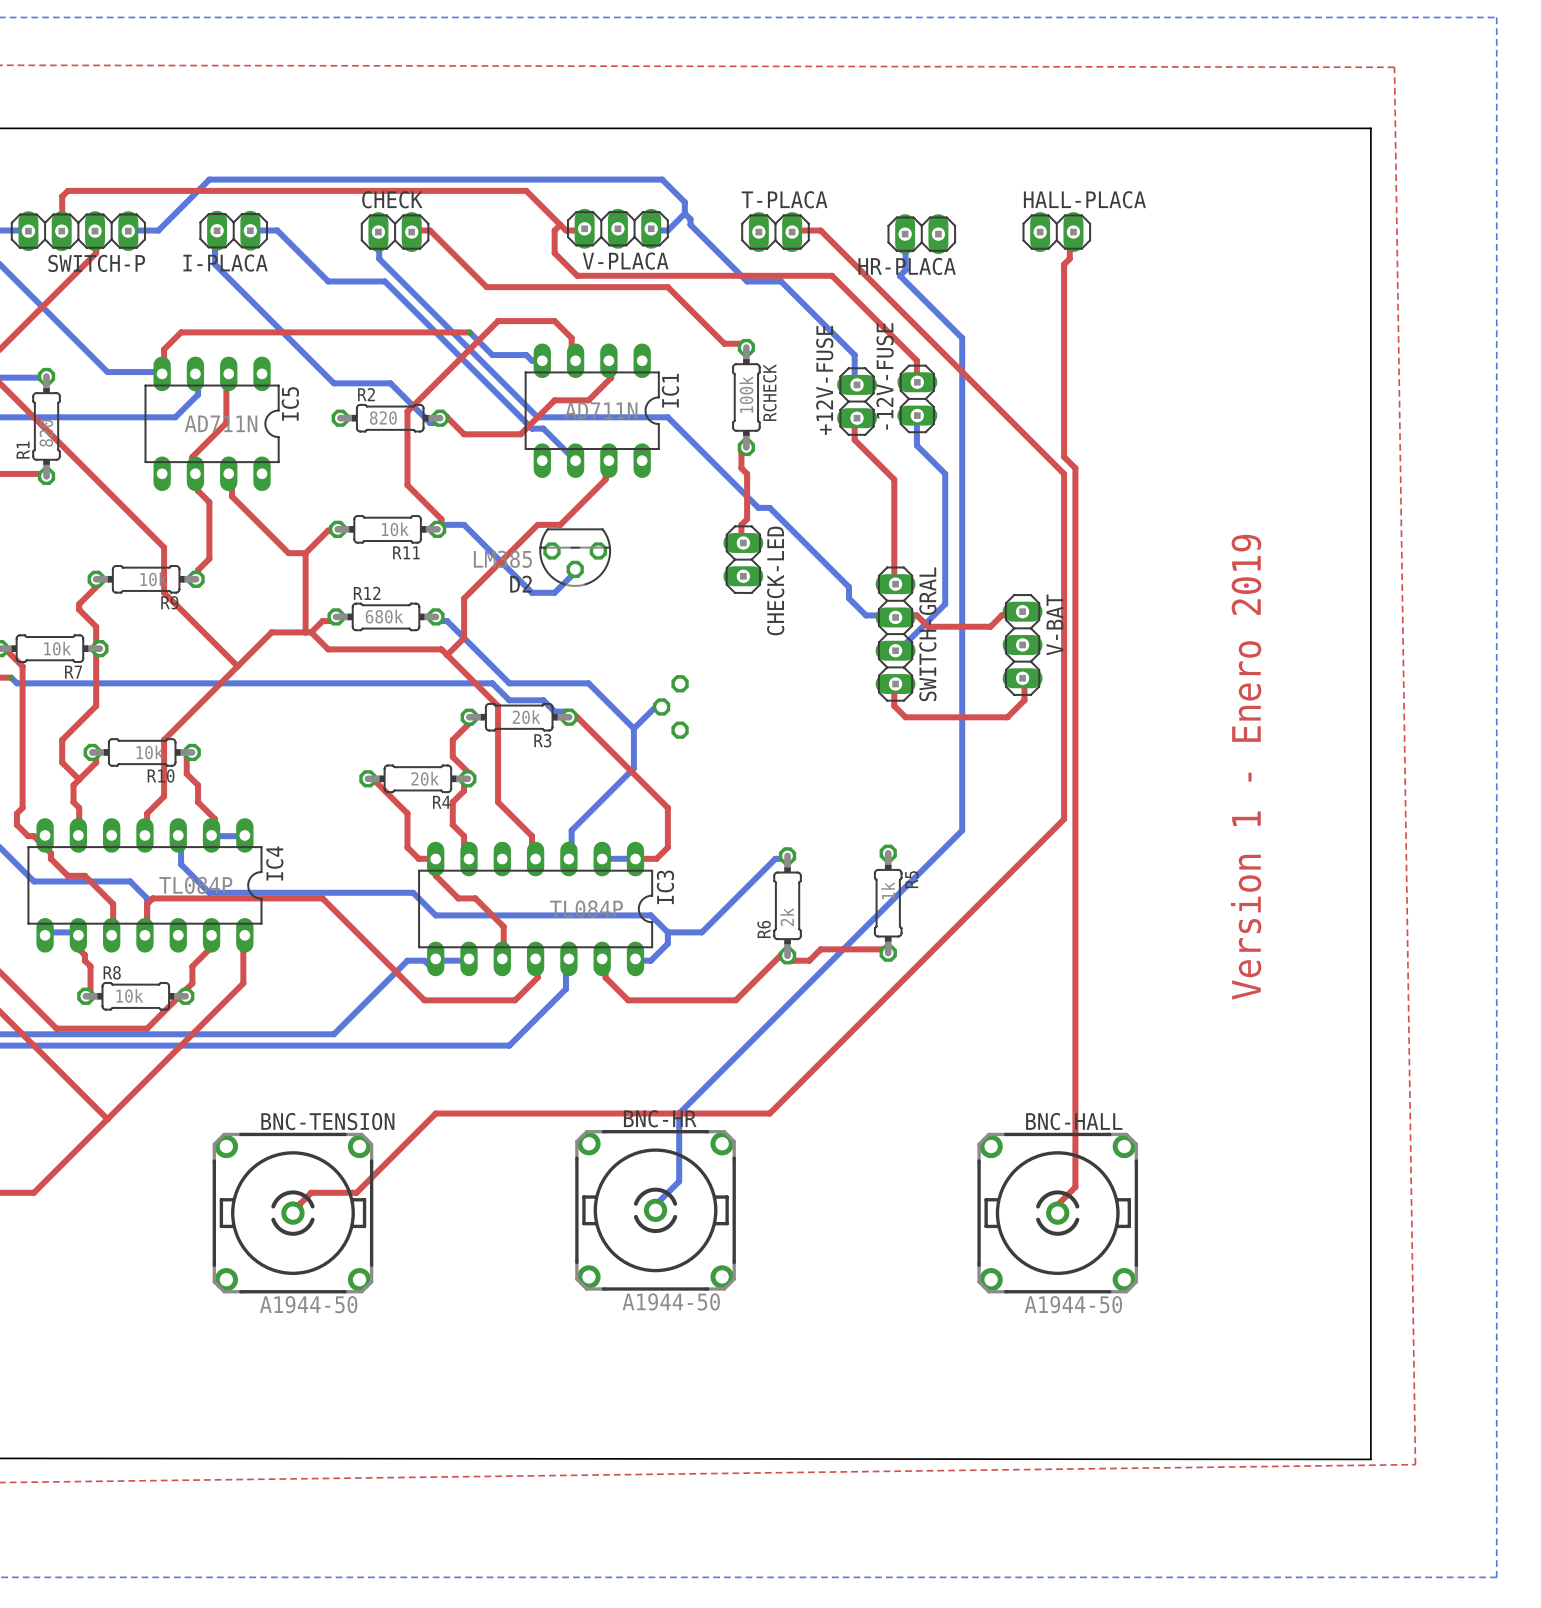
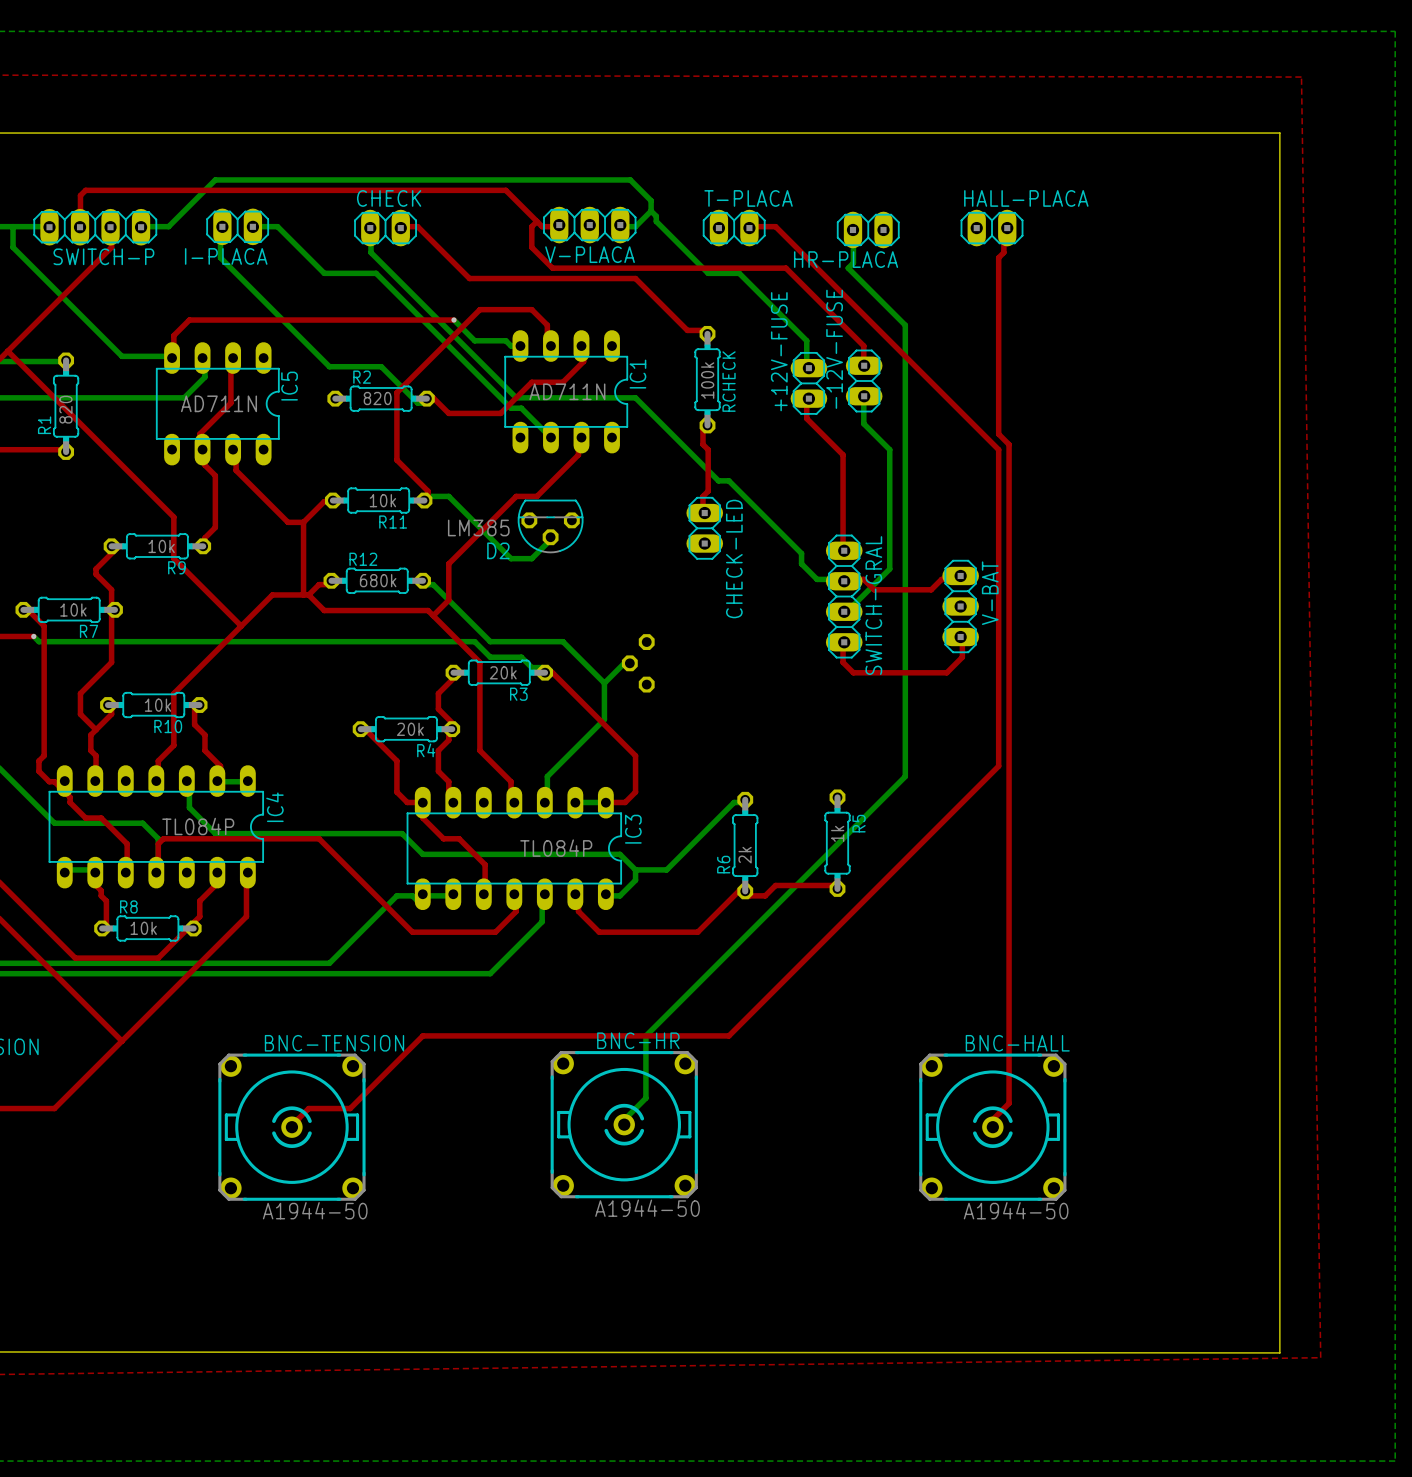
text: Version 1 - Enero 2019 (1246, 767) -> none

